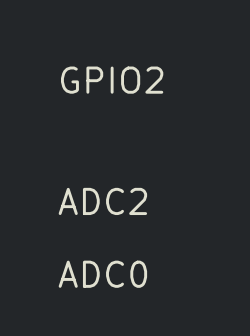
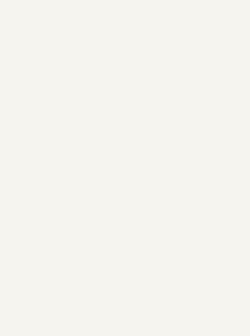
label: GPIO2 (112, 80) -> none
label: ADC2 (102, 201) -> none
label: ADC0 (102, 274) -> none

